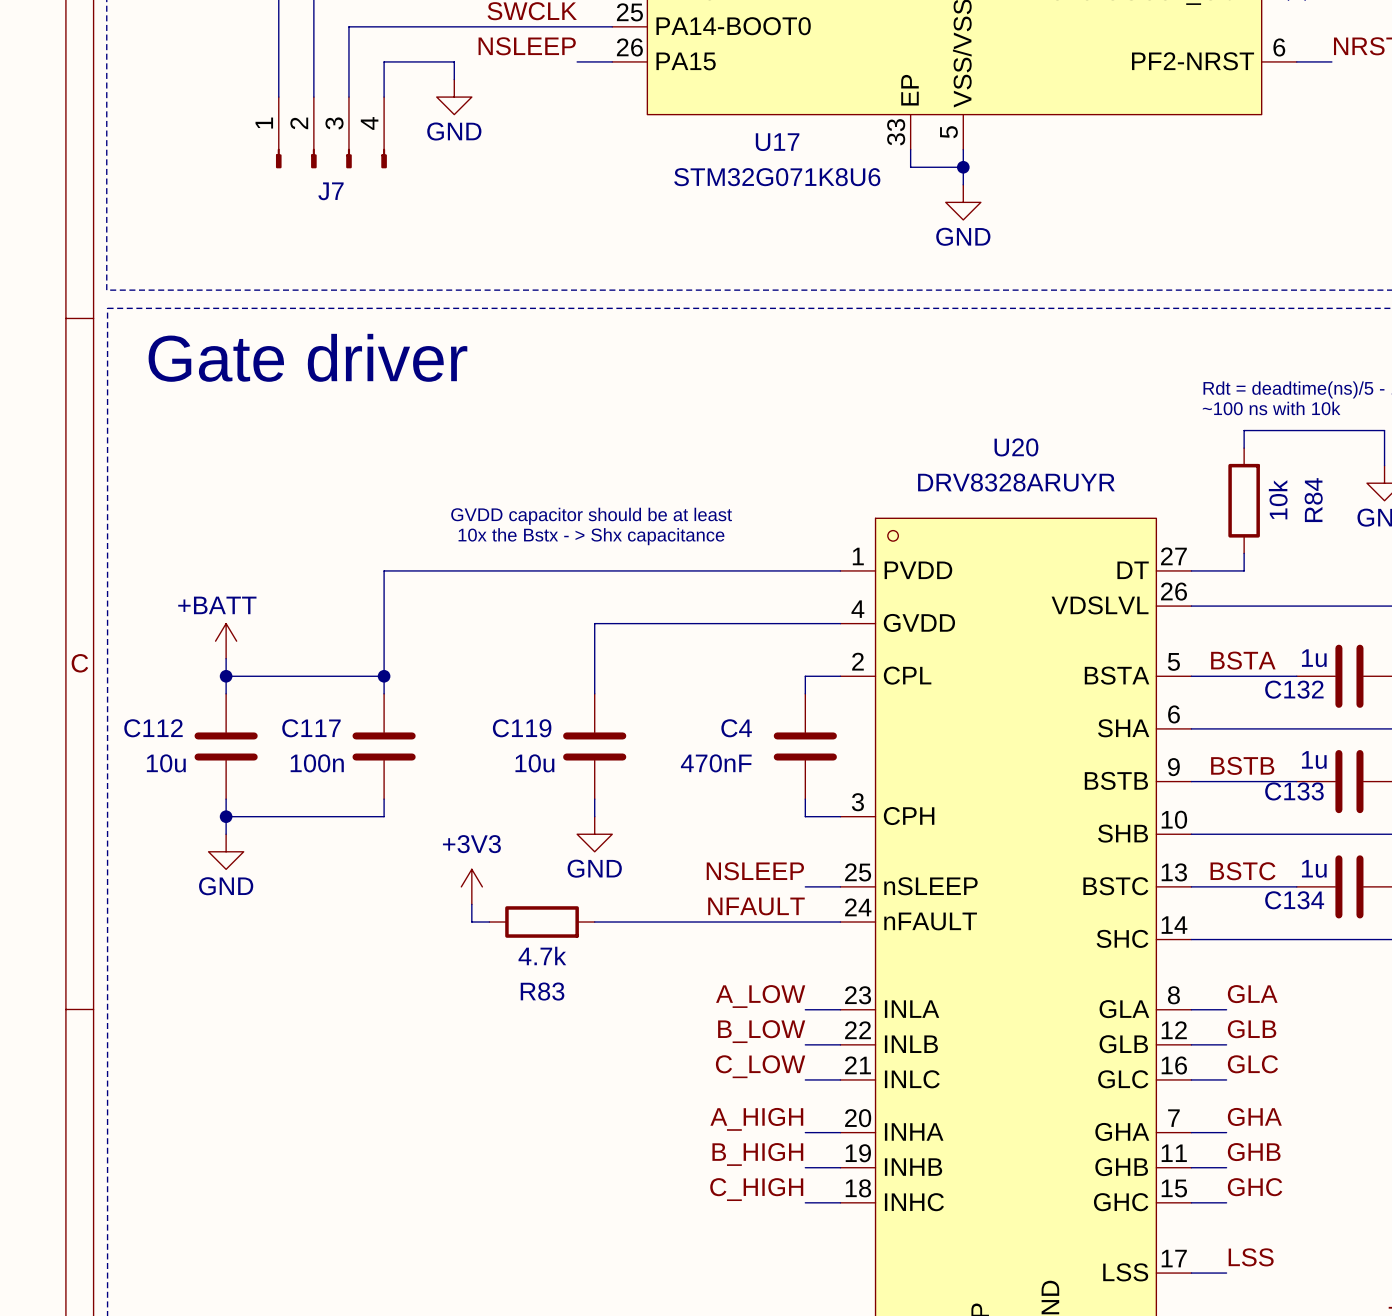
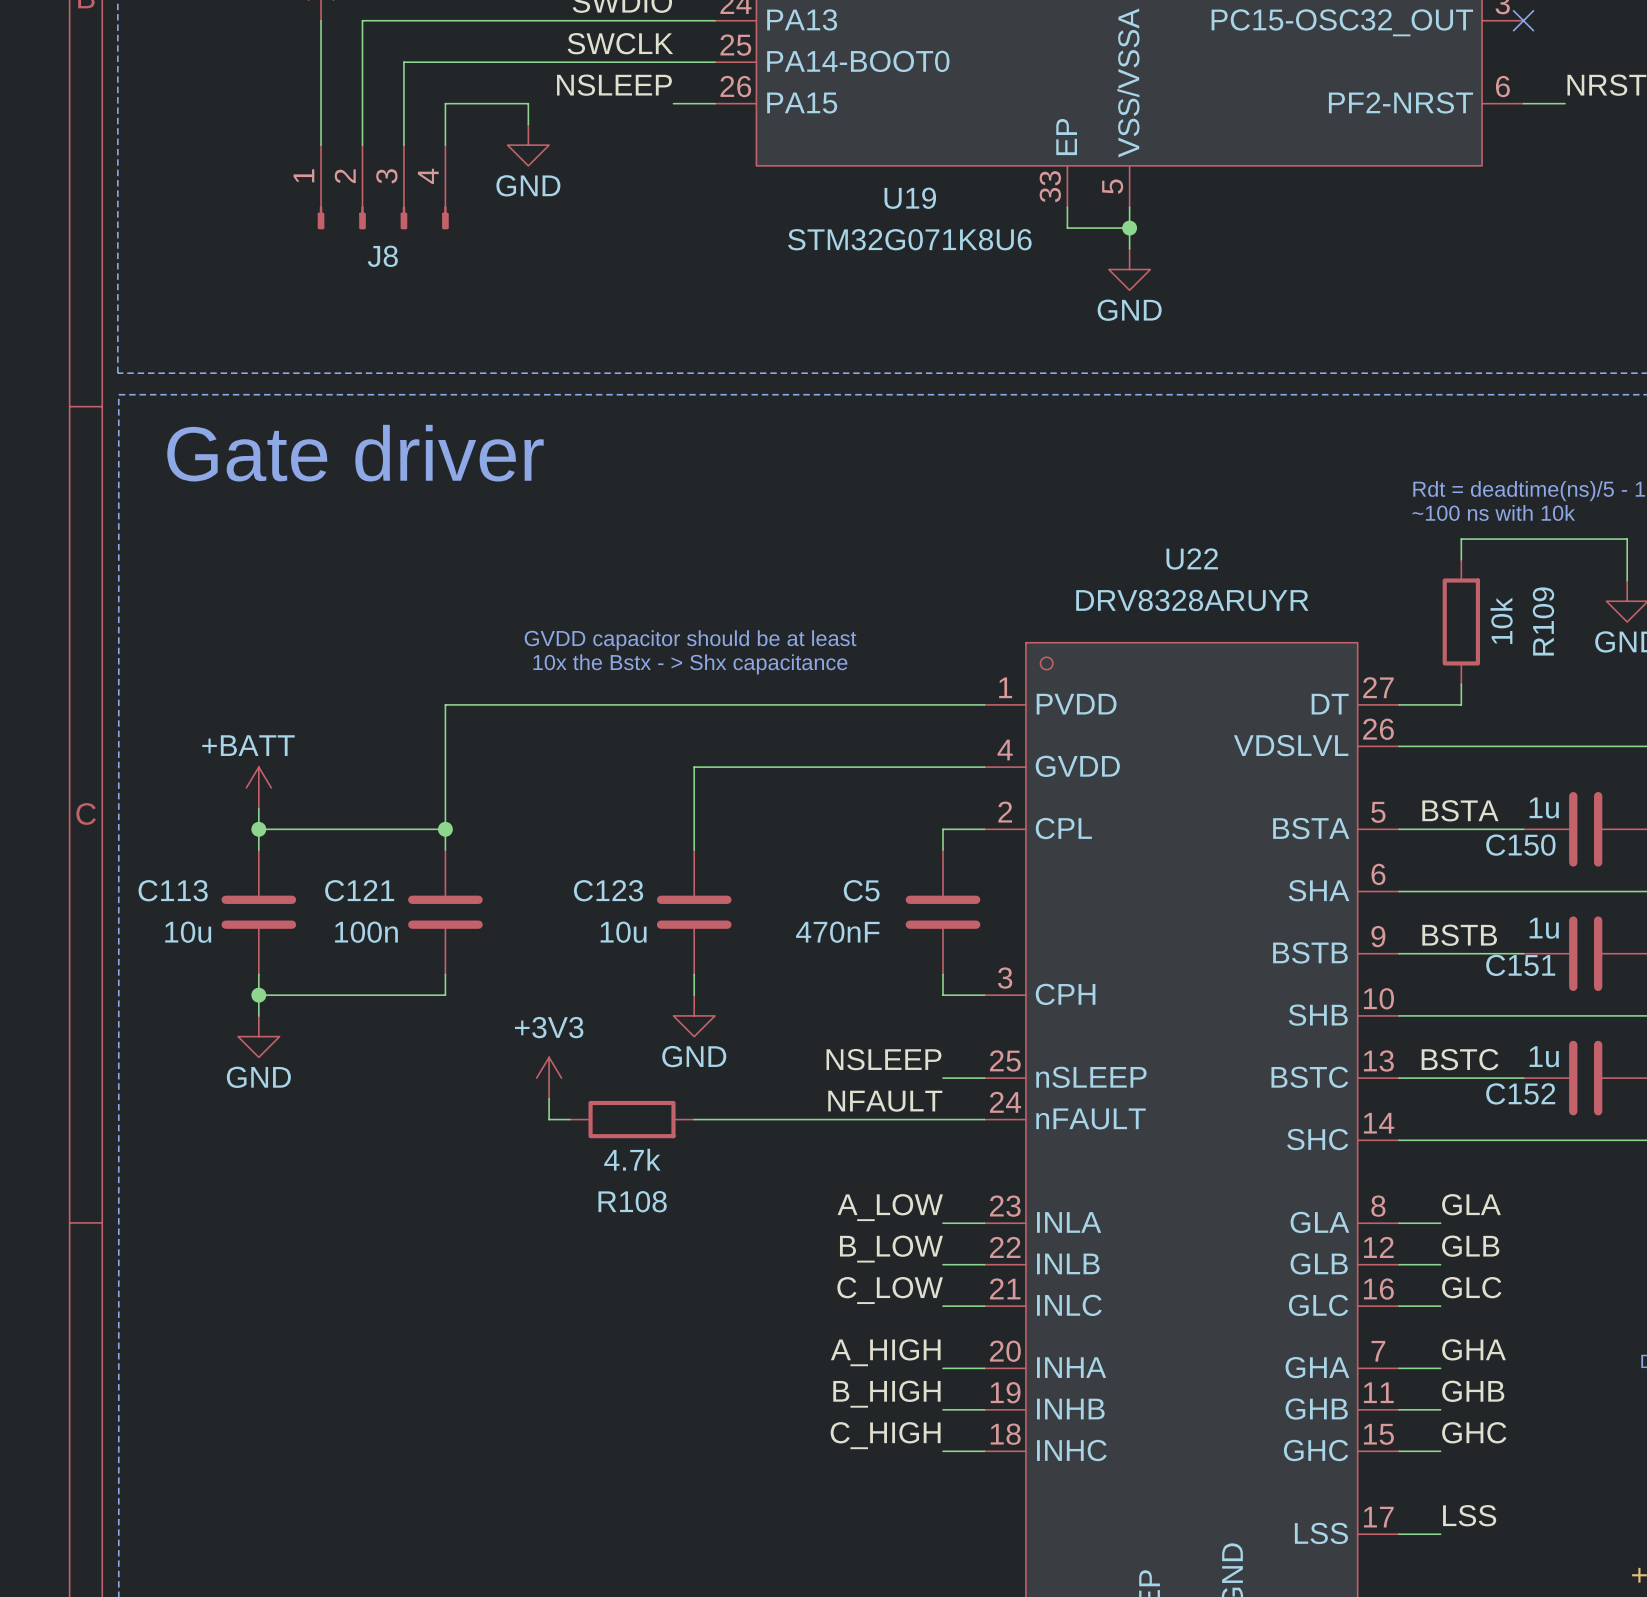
U17 name: U17 (777, 142) -> U19 (910, 198)
J7 name: J7 (330, 191) -> J8 (382, 256)
U20 name: U20 (1016, 447) -> U22 (1192, 559)
R84 name: R84 (1313, 500) -> R109 (1543, 621)
C132 name: C132 (1294, 689) -> C150 (1520, 845)
C112 name: C112 (153, 728) -> C113 (173, 890)
C117 name: C117 (311, 728) -> C121 (359, 890)
C119 name: C119 (522, 728) -> C123 (608, 890)
C4 name: C4 (736, 728) -> C5 (861, 890)
C133 name: C133 (1294, 791) -> C151 (1520, 965)
C134 name: C134 (1294, 900) -> C152 (1520, 1093)
R83 name: R83 (542, 991) -> R108 (632, 1201)

